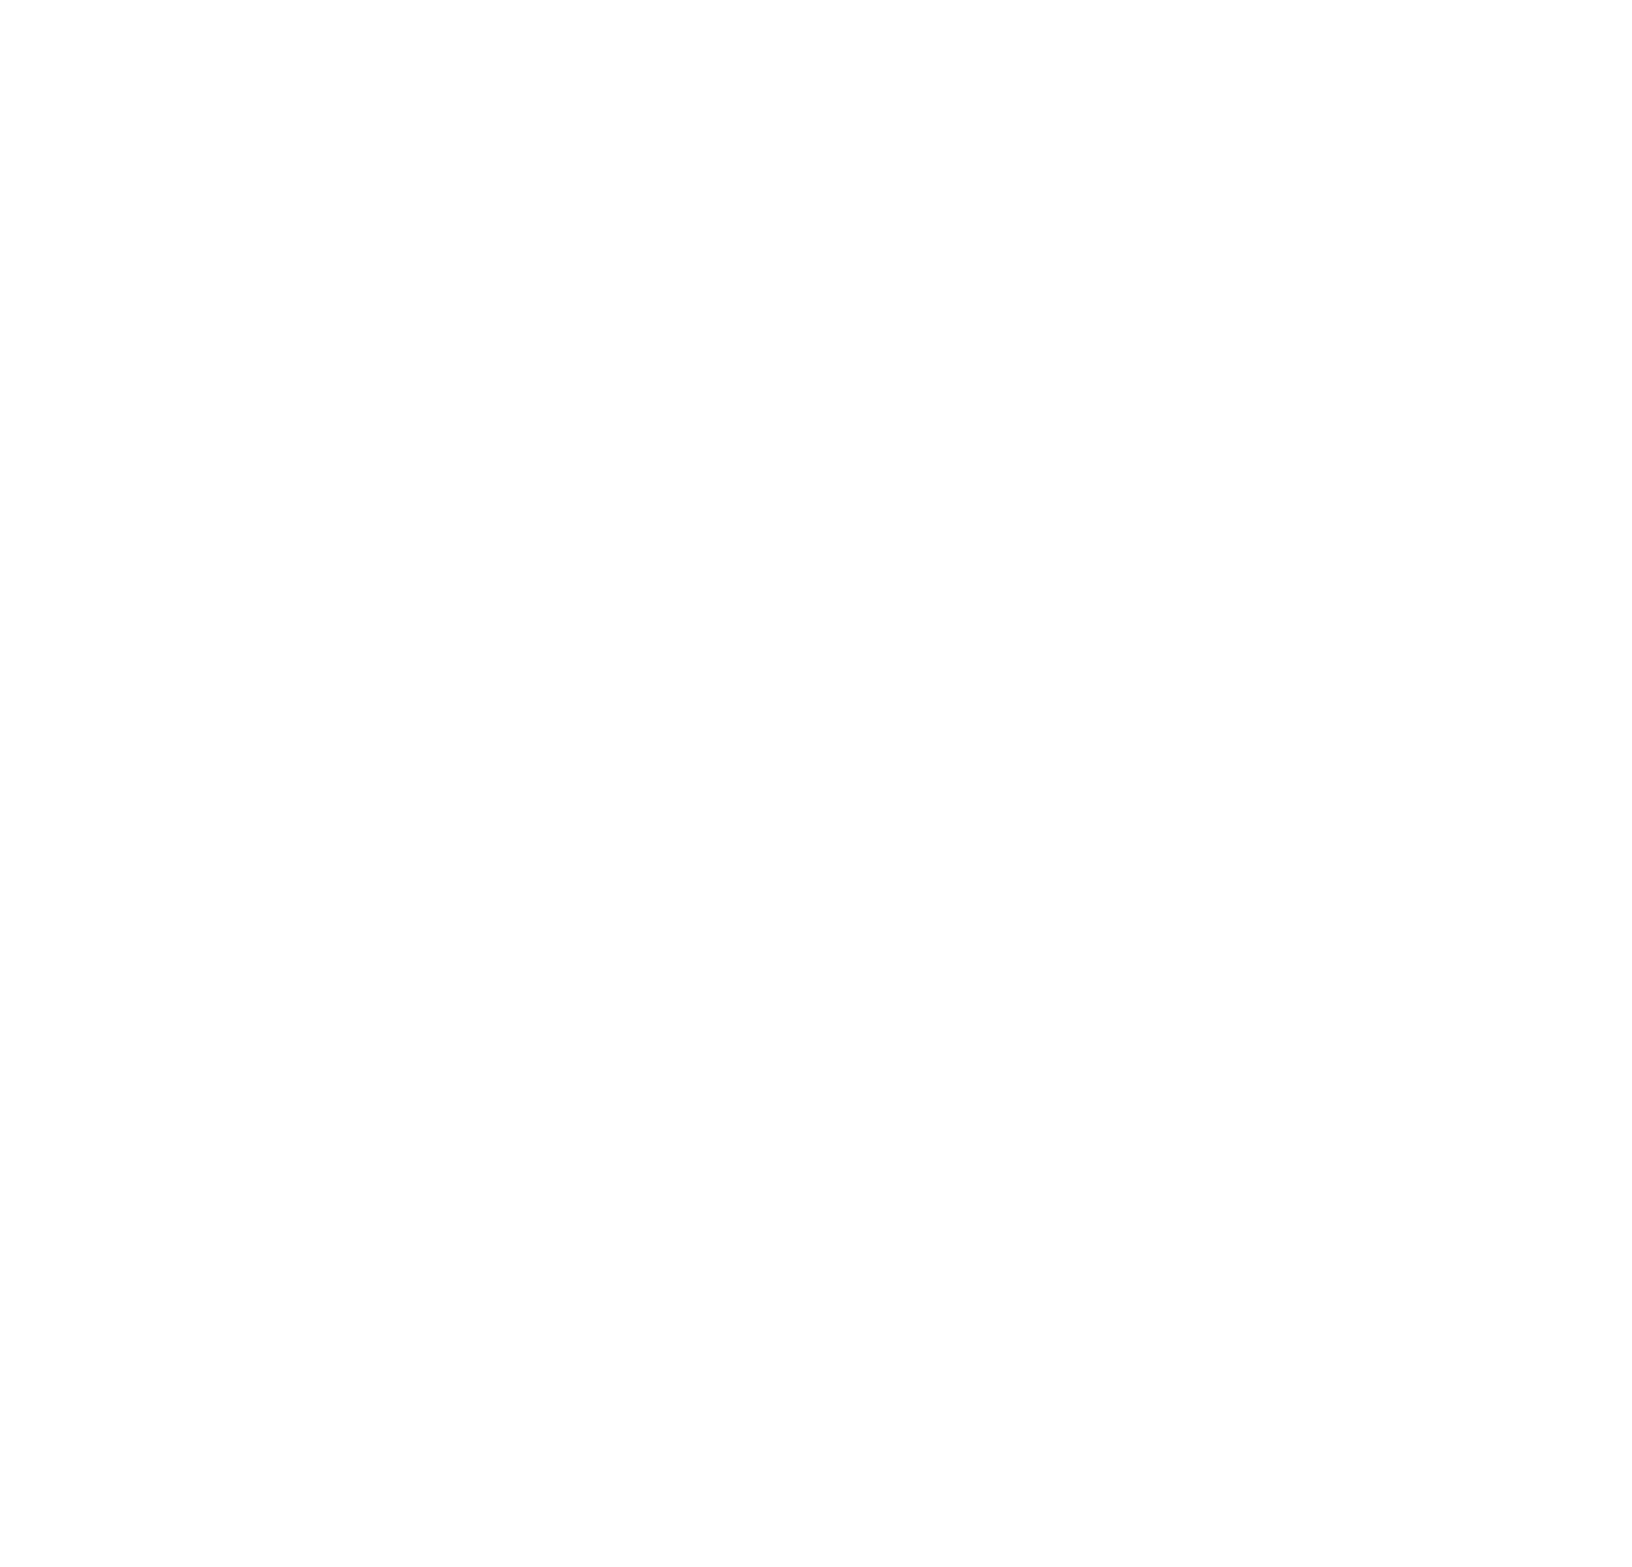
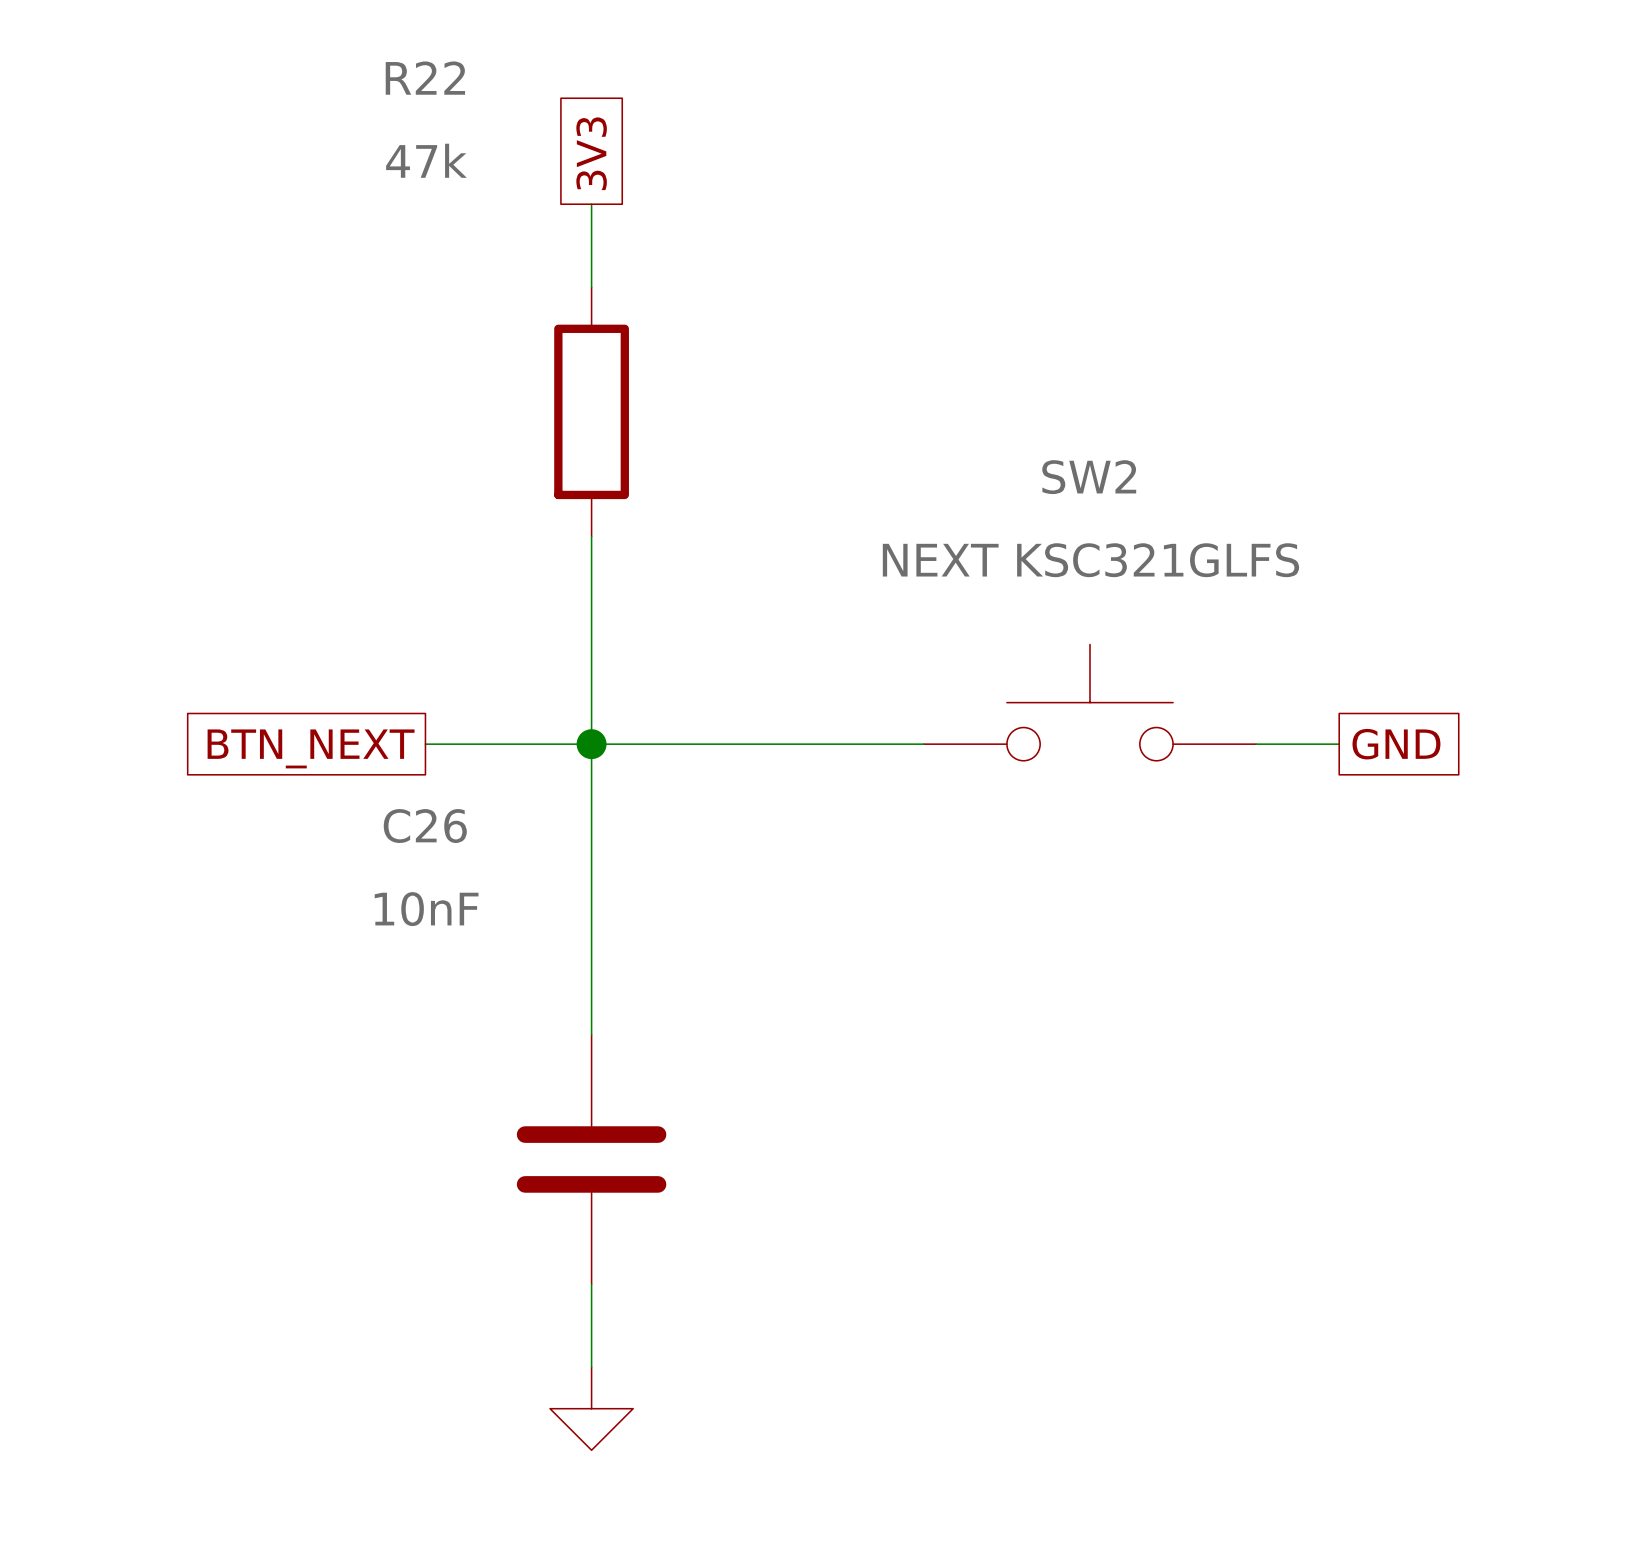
global label: none -> 3V3 (591, 153)
wire: none -> (591, 204) (591, 287)
R22: none -> 47k (591, 411)
wire: none -> (591, 536) (591, 1034)
SW2: none -> NEXT KSC321GLFS (1089, 702)
wire: none -> (425, 744) (923, 744)
junction: none -> (591, 744)
wire: none -> (1256, 744) (1339, 744)
global label: none -> GND (1396, 744)
global label: none -> BTN_NEXT (311, 748)
C26: none -> 10nF (591, 1159)
wire: none -> (591, 1284) (591, 1367)
power symbol: none -> (591, 1408)

